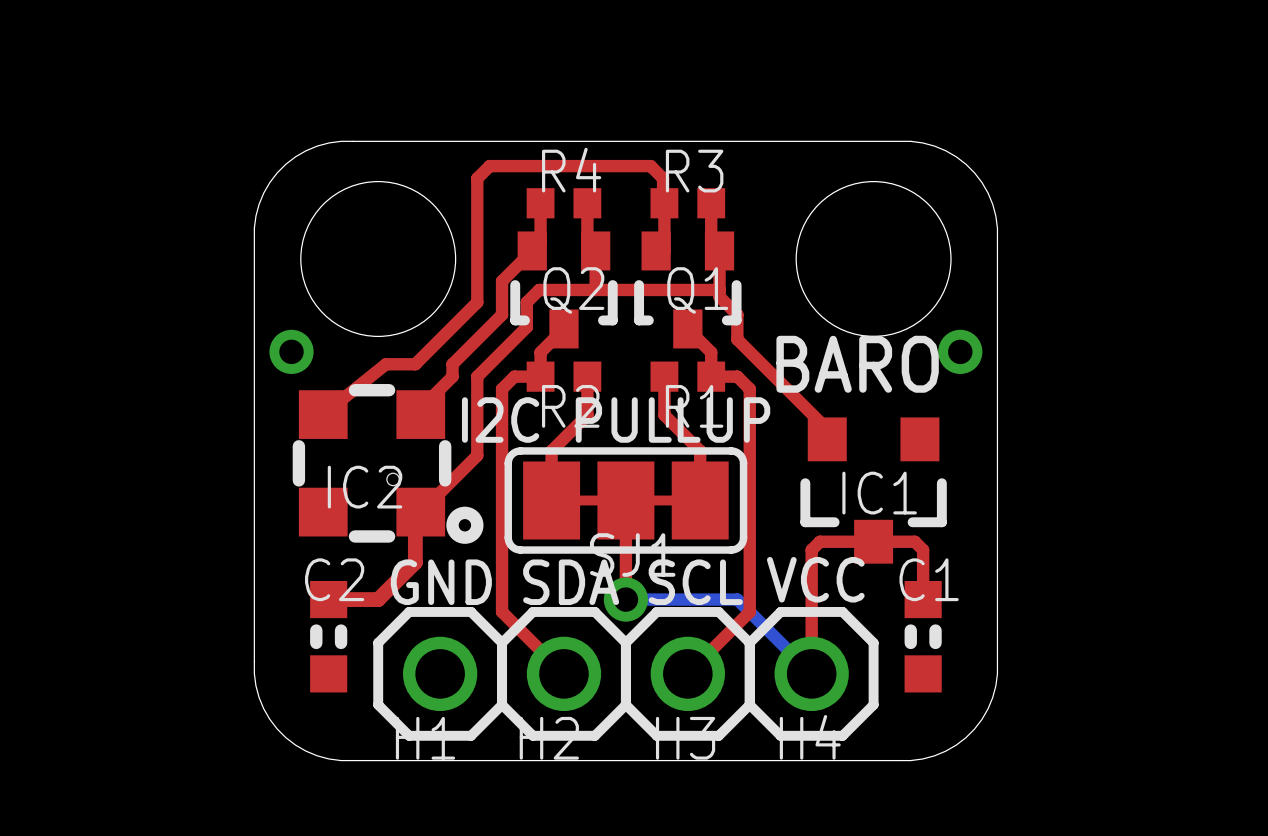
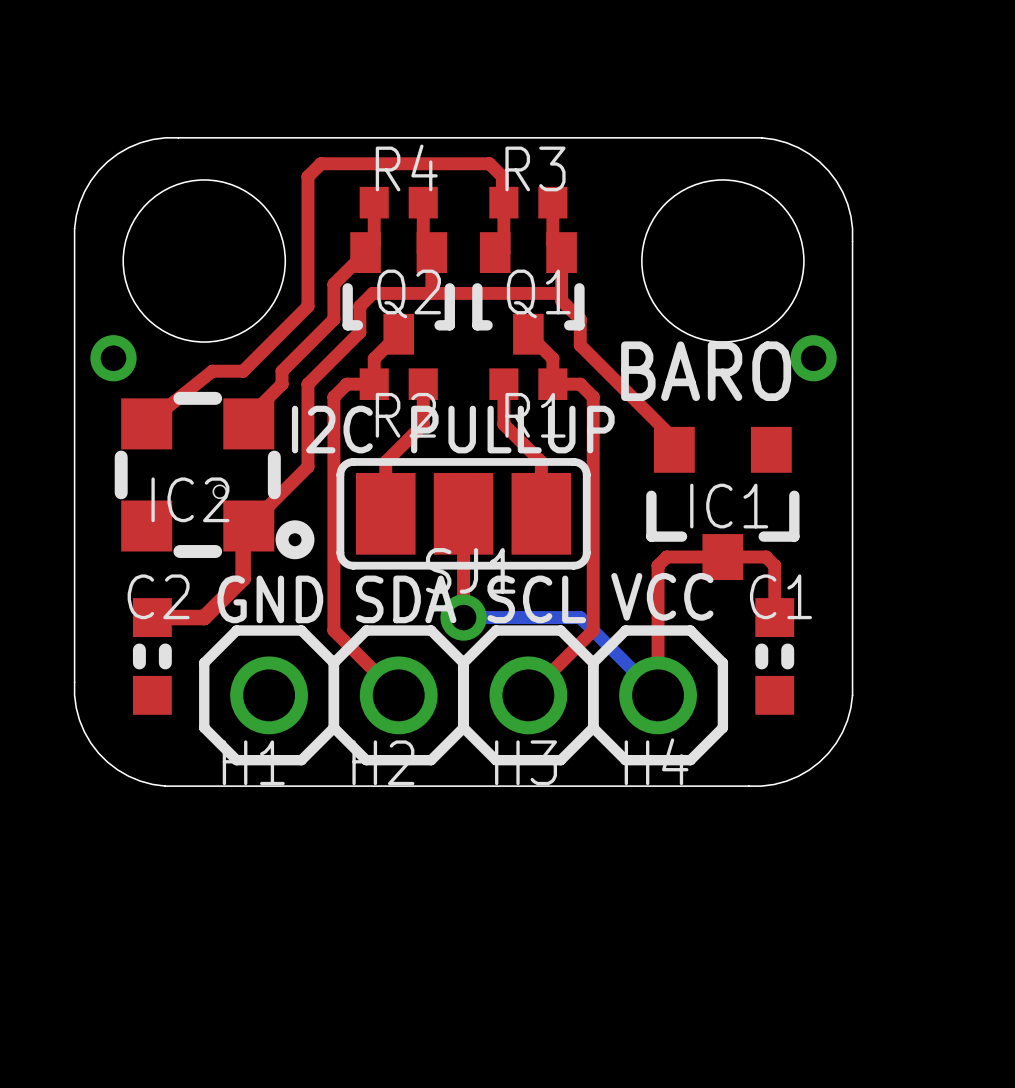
top track: (576, 500) (601, 500) -> none
top track: (650, 500) (675, 500) -> none

